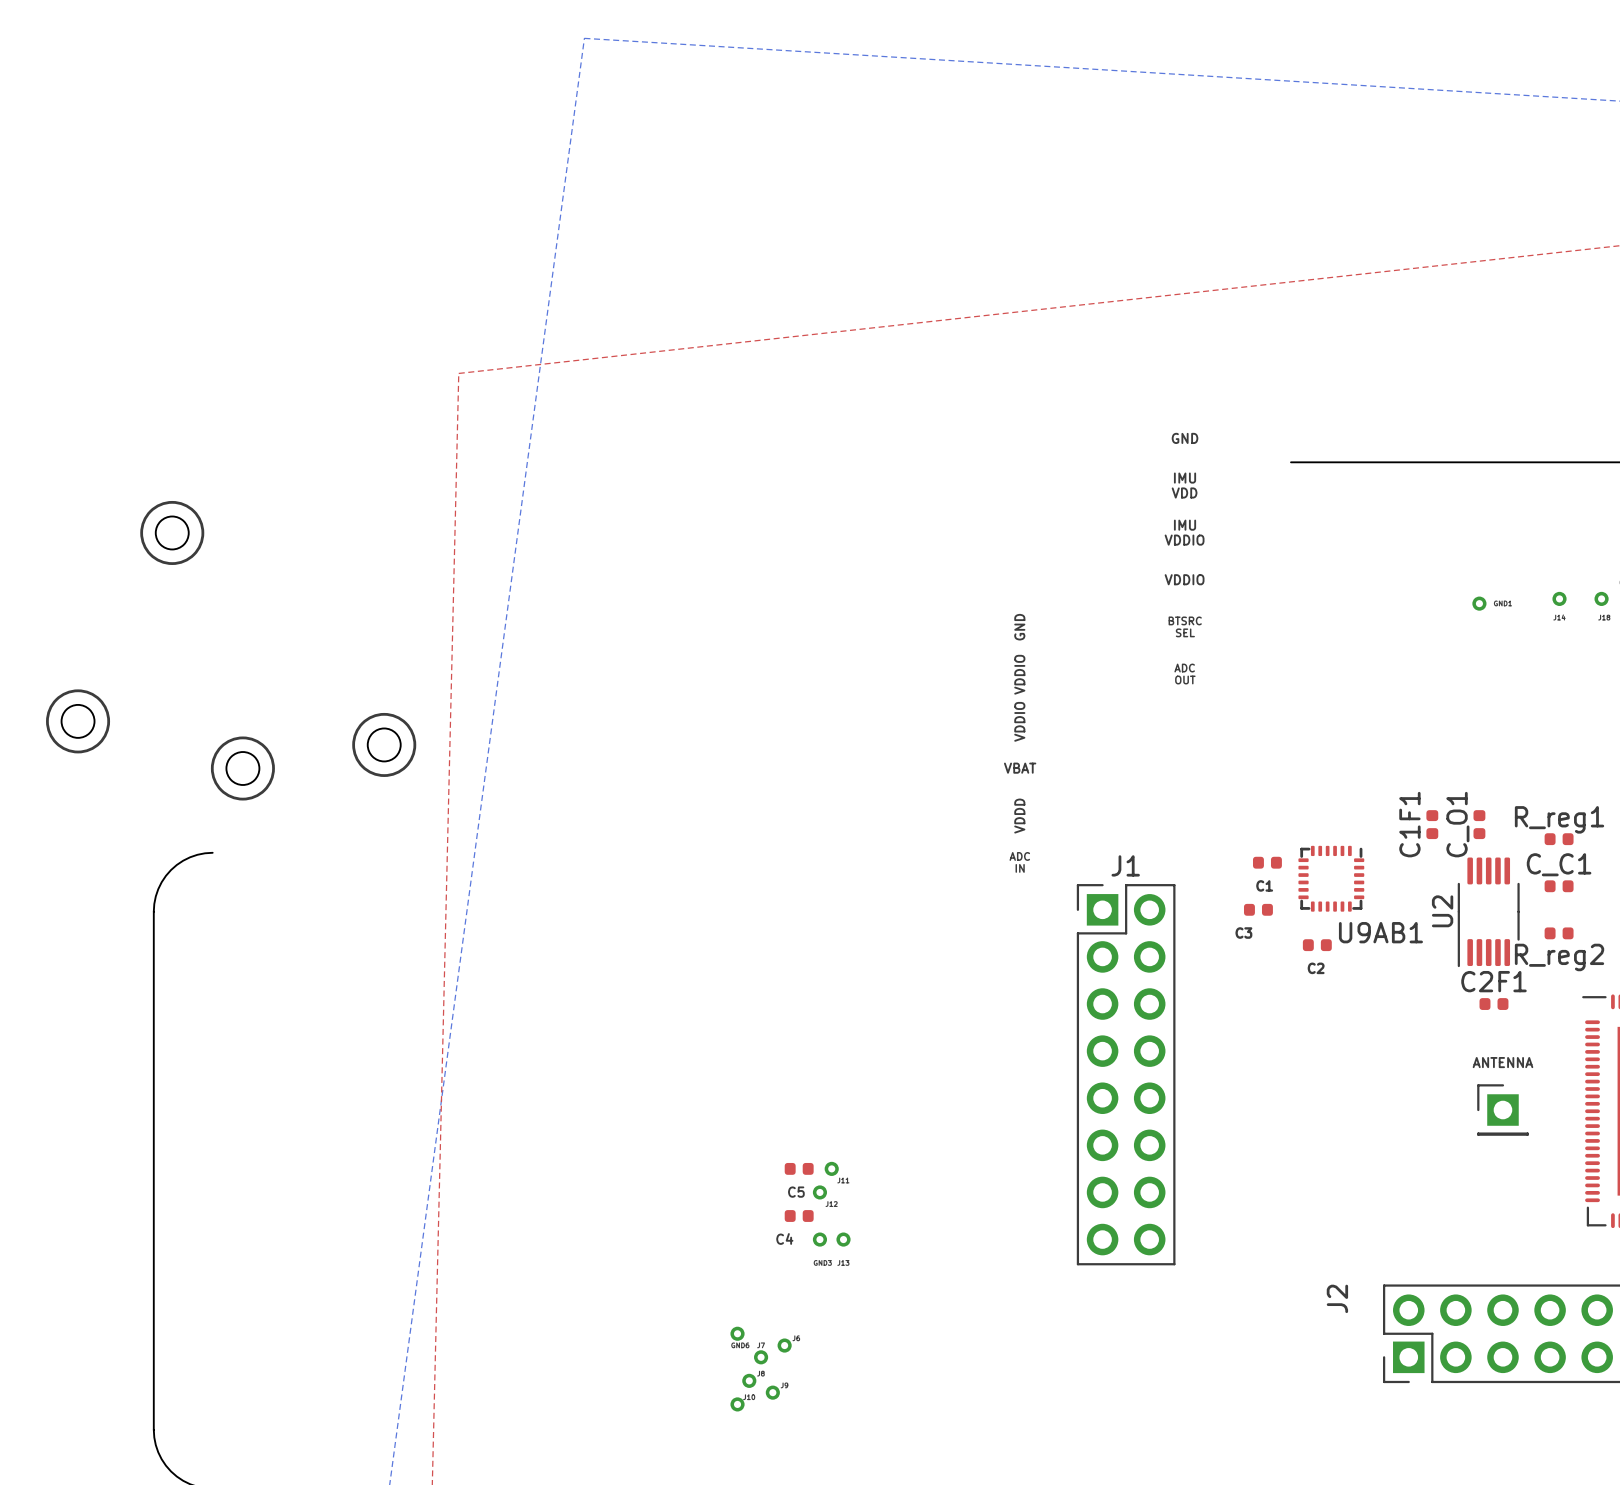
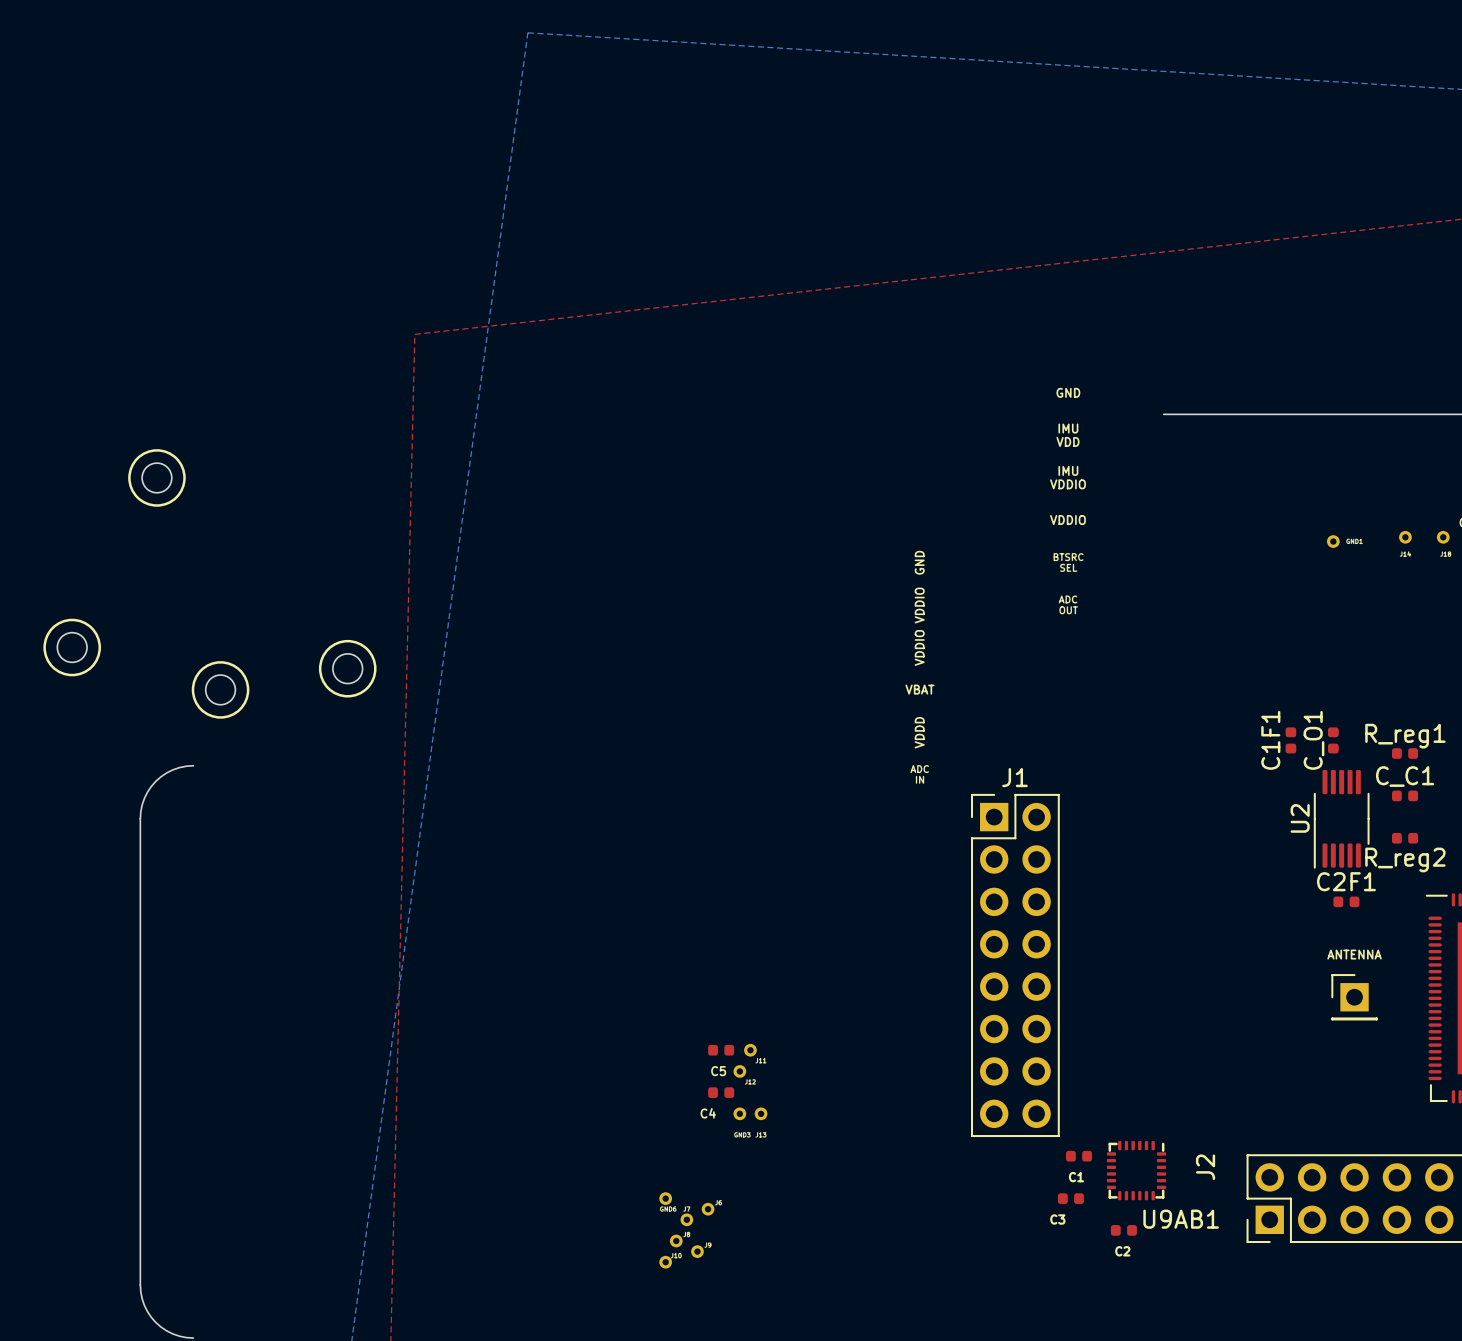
C1 position: (1267, 862) -> (1078, 1156)
U9AB1 position: (1331, 878) -> (1136, 1170)
C3 position: (1258, 909) -> (1070, 1198)
C2 position: (1317, 945) -> (1123, 1230)

